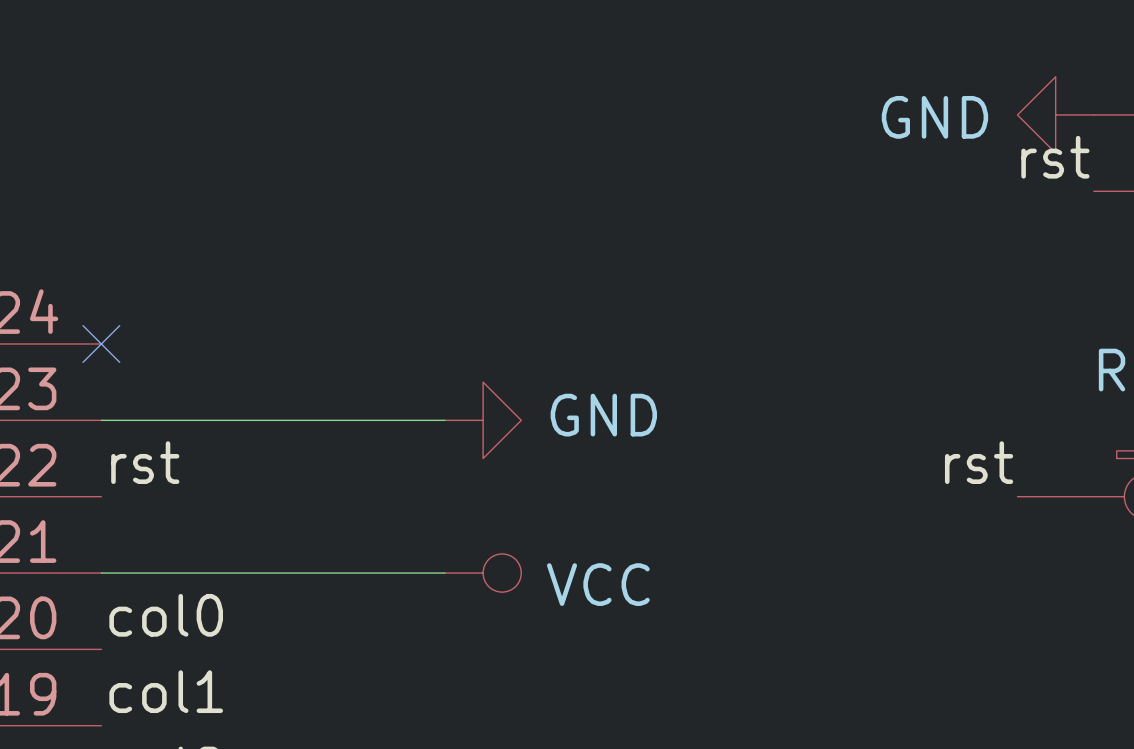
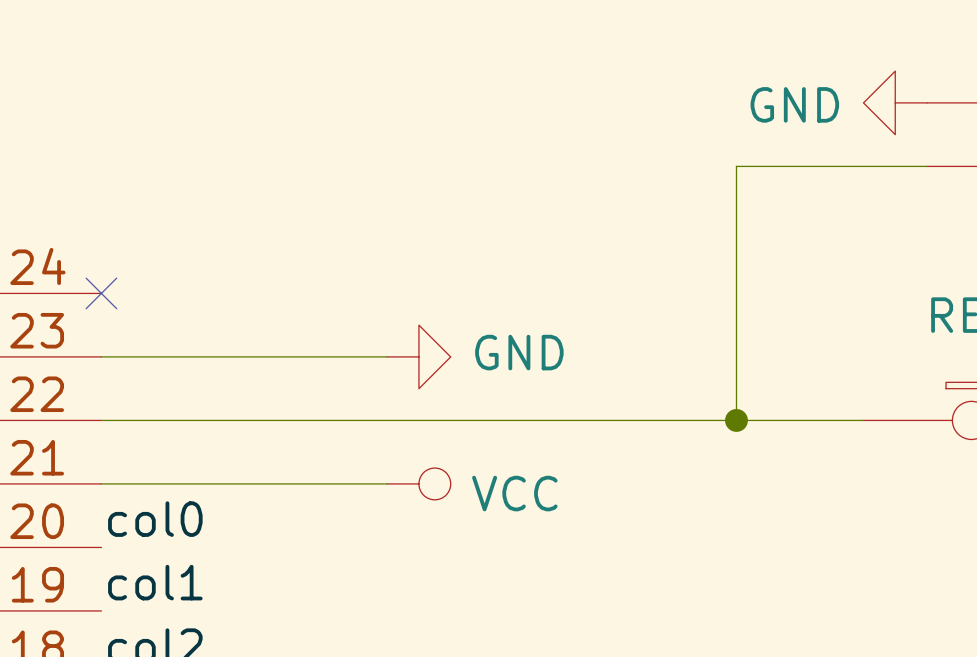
label: rst (1055, 157) -> none
wire: none -> (927, 166) (736, 166) (736, 420)
label: rst (145, 462) -> none
label: rst (979, 462) -> none
wire: none -> (101, 420) (863, 420)
junction: none -> (736, 420)

